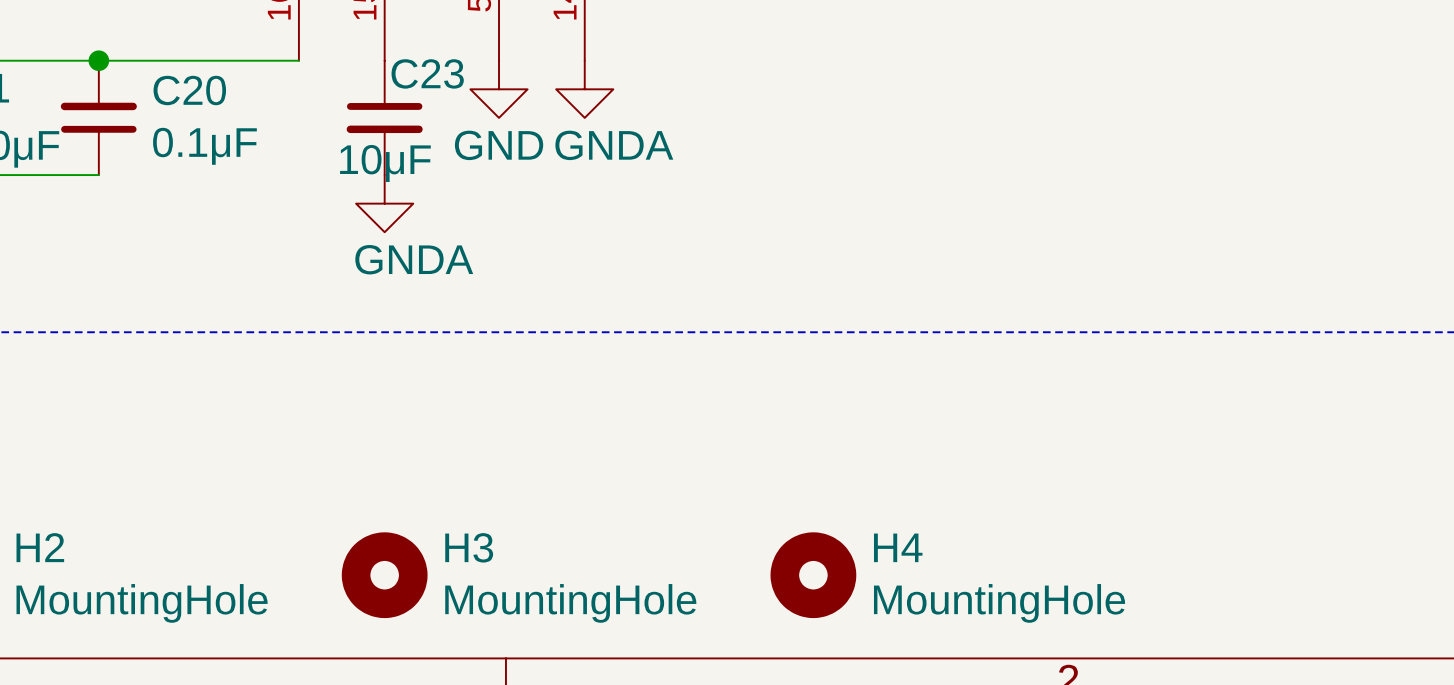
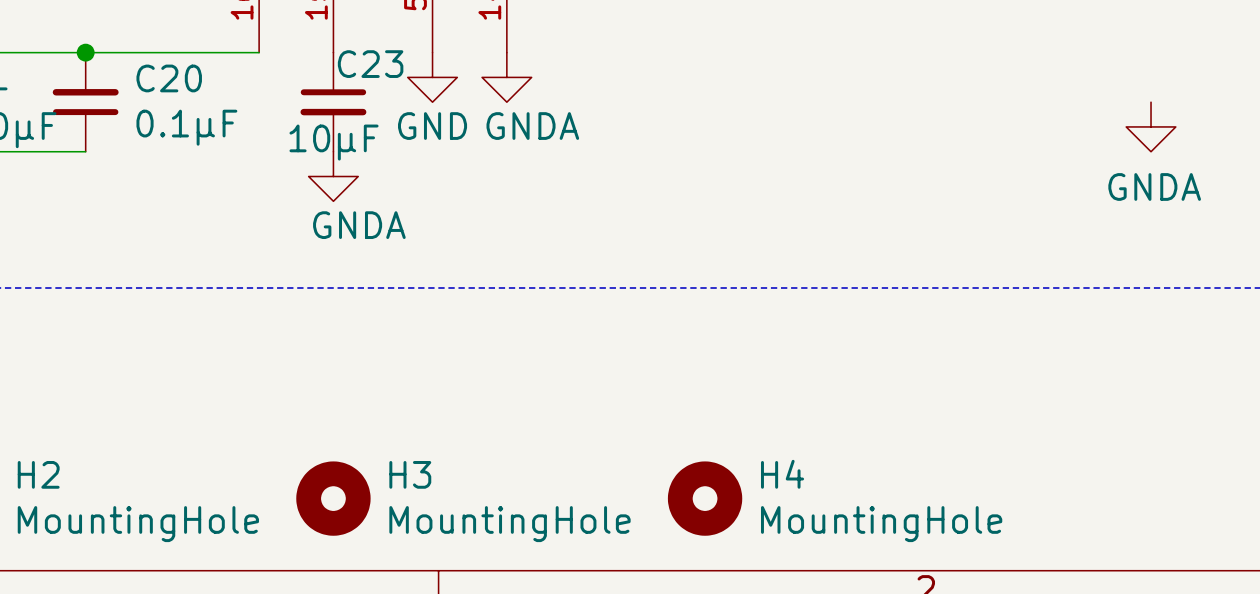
power symbol: none -> GNDA (1151, 126)

